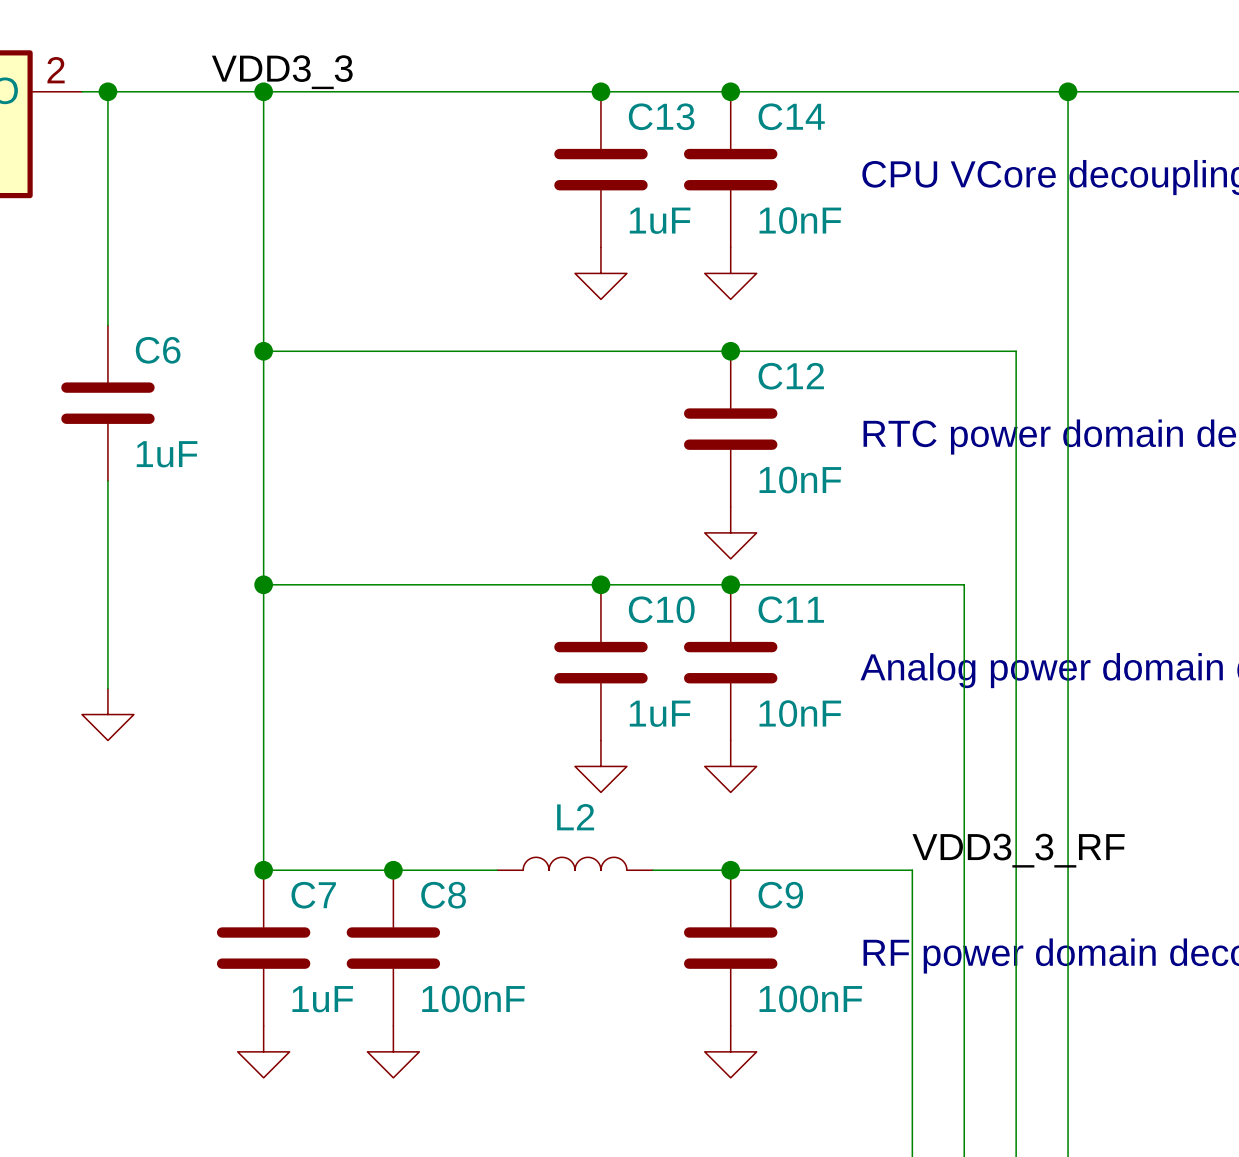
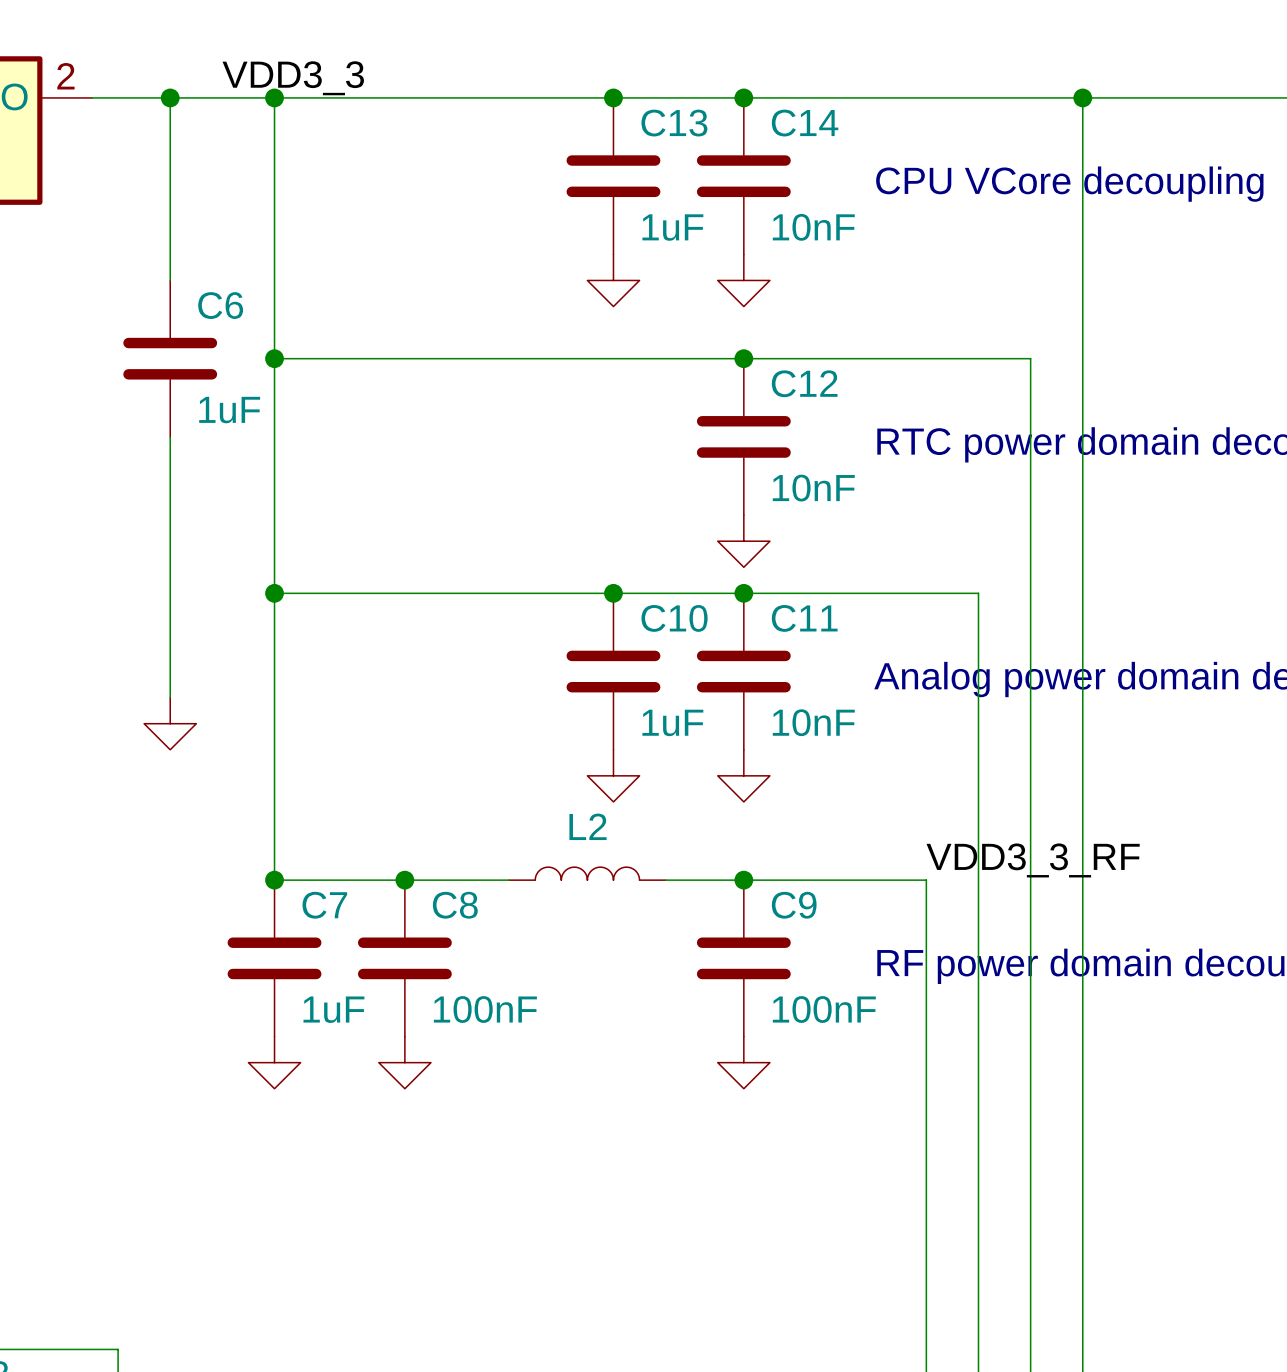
wire: (107, 91) (107, 325) -> none
junction position: (107, 91) -> (170, 97)
wire: none -> (170, 97) (170, 280)
C6 position: (107, 403) -> (170, 358)
wire: none -> (170, 436) (170, 697)
wire: (107, 481) (107, 688) -> none
power symbol position: (107, 714) -> (170, 723)

